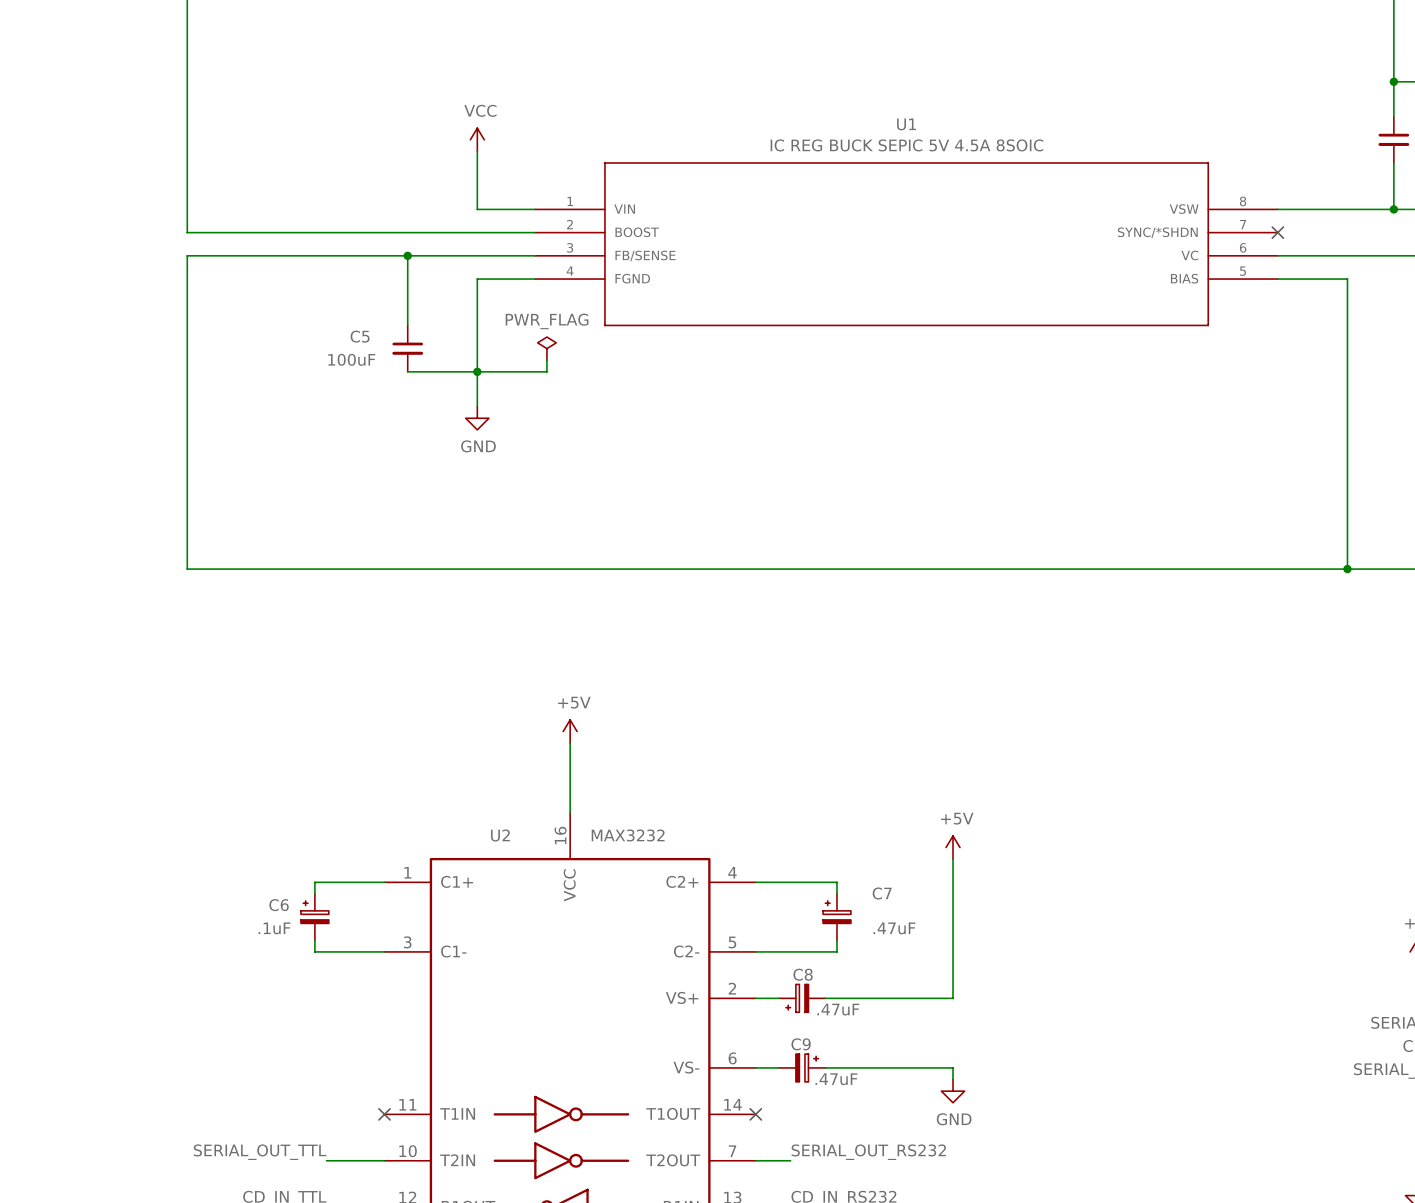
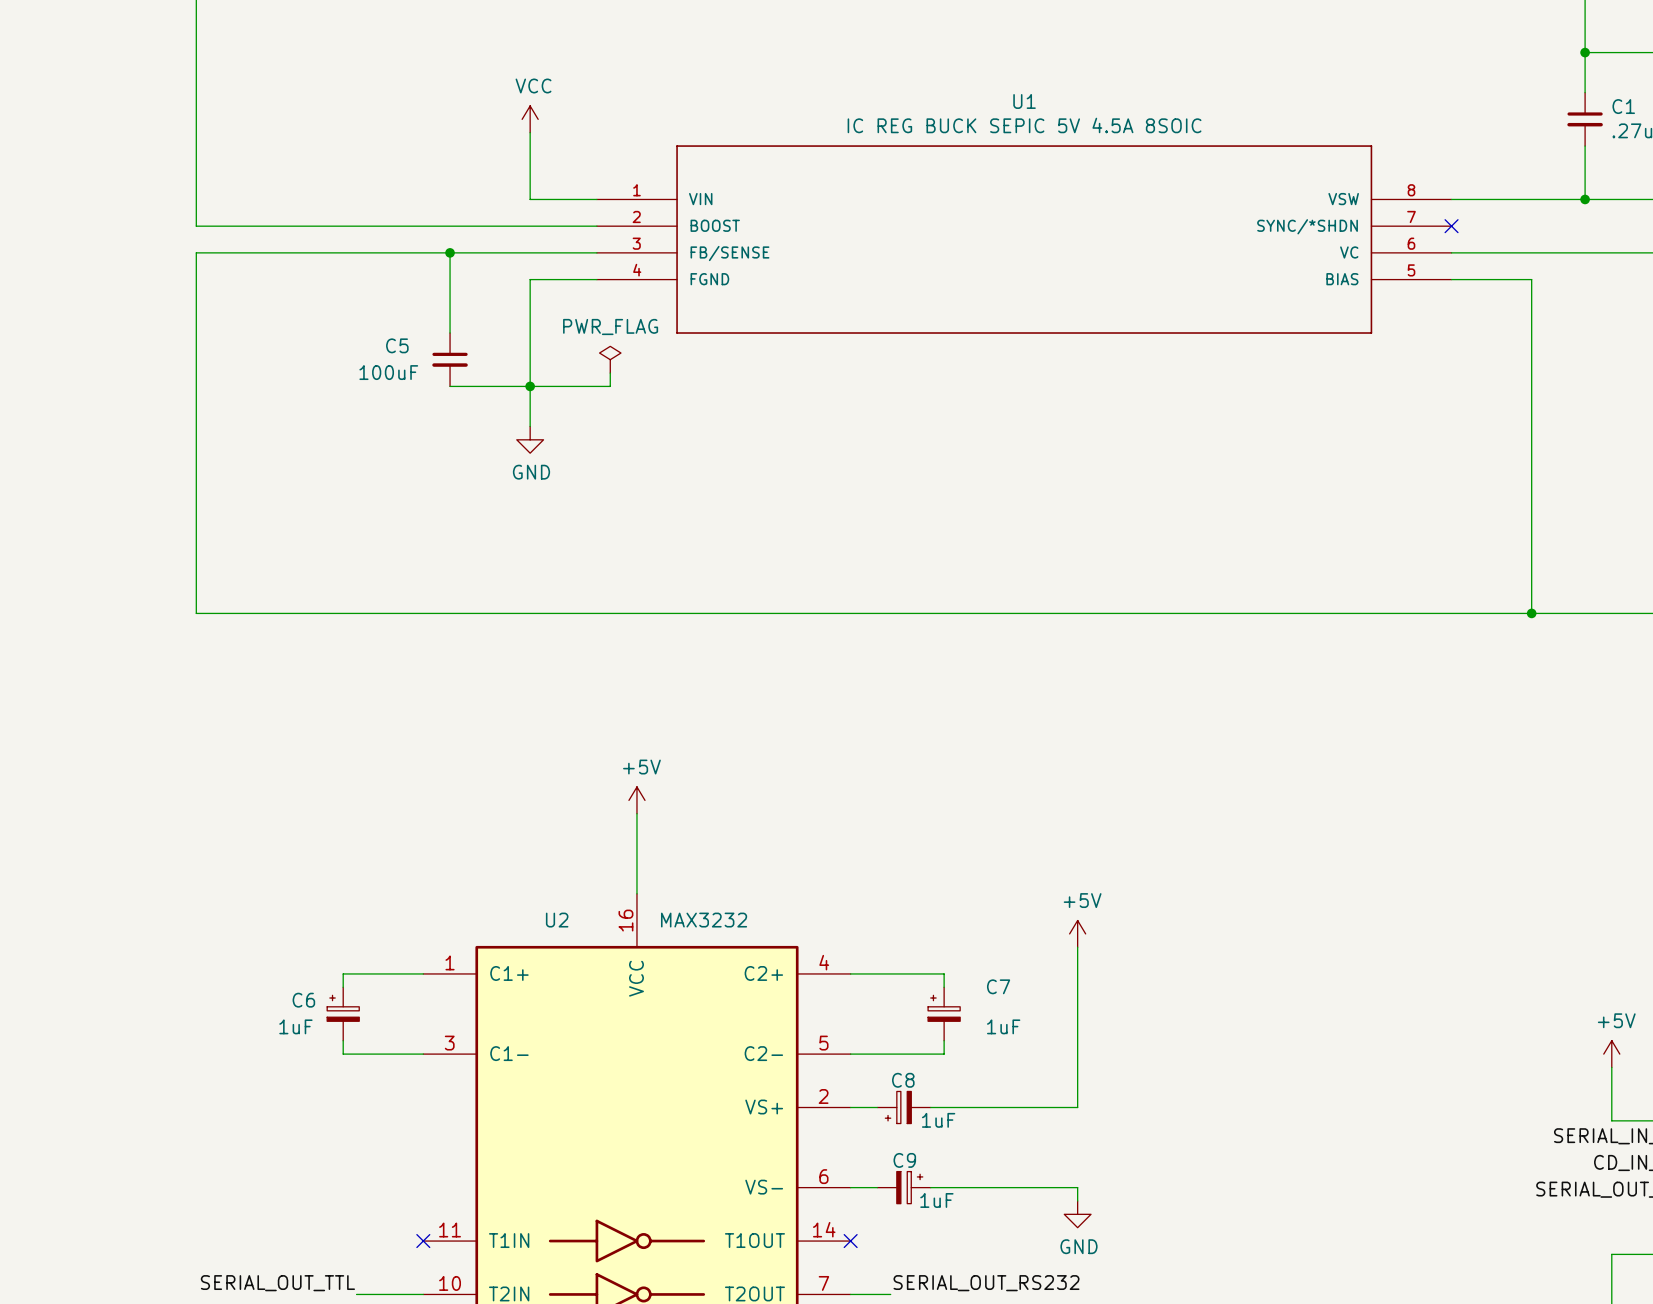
C6 value: .1uF (274, 928) -> 1uF (295, 1026)
C7 value: .47uF (894, 928) -> 1uF (1003, 1026)
C8 value: .47uF (838, 1009) -> 1uF (938, 1120)
C9 value: .47uF (836, 1079) -> 1uF (936, 1200)

